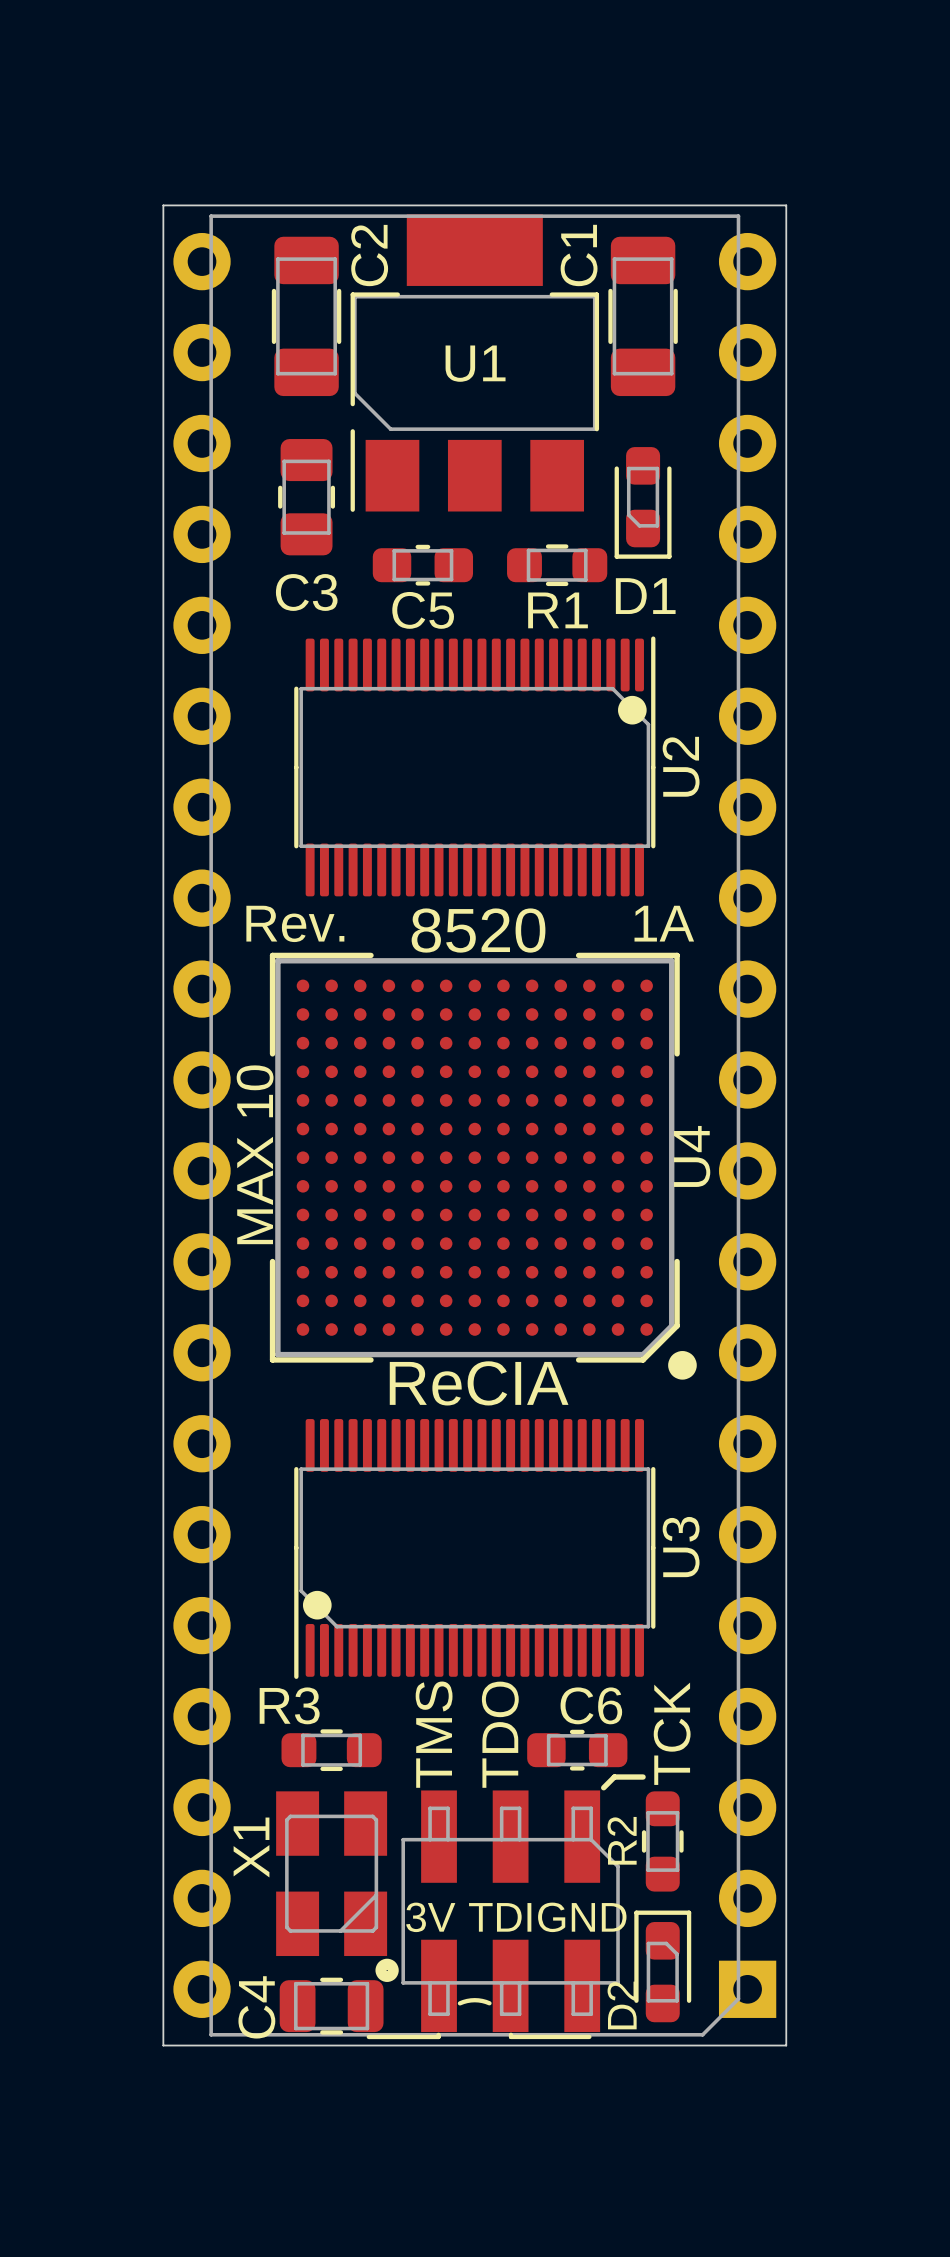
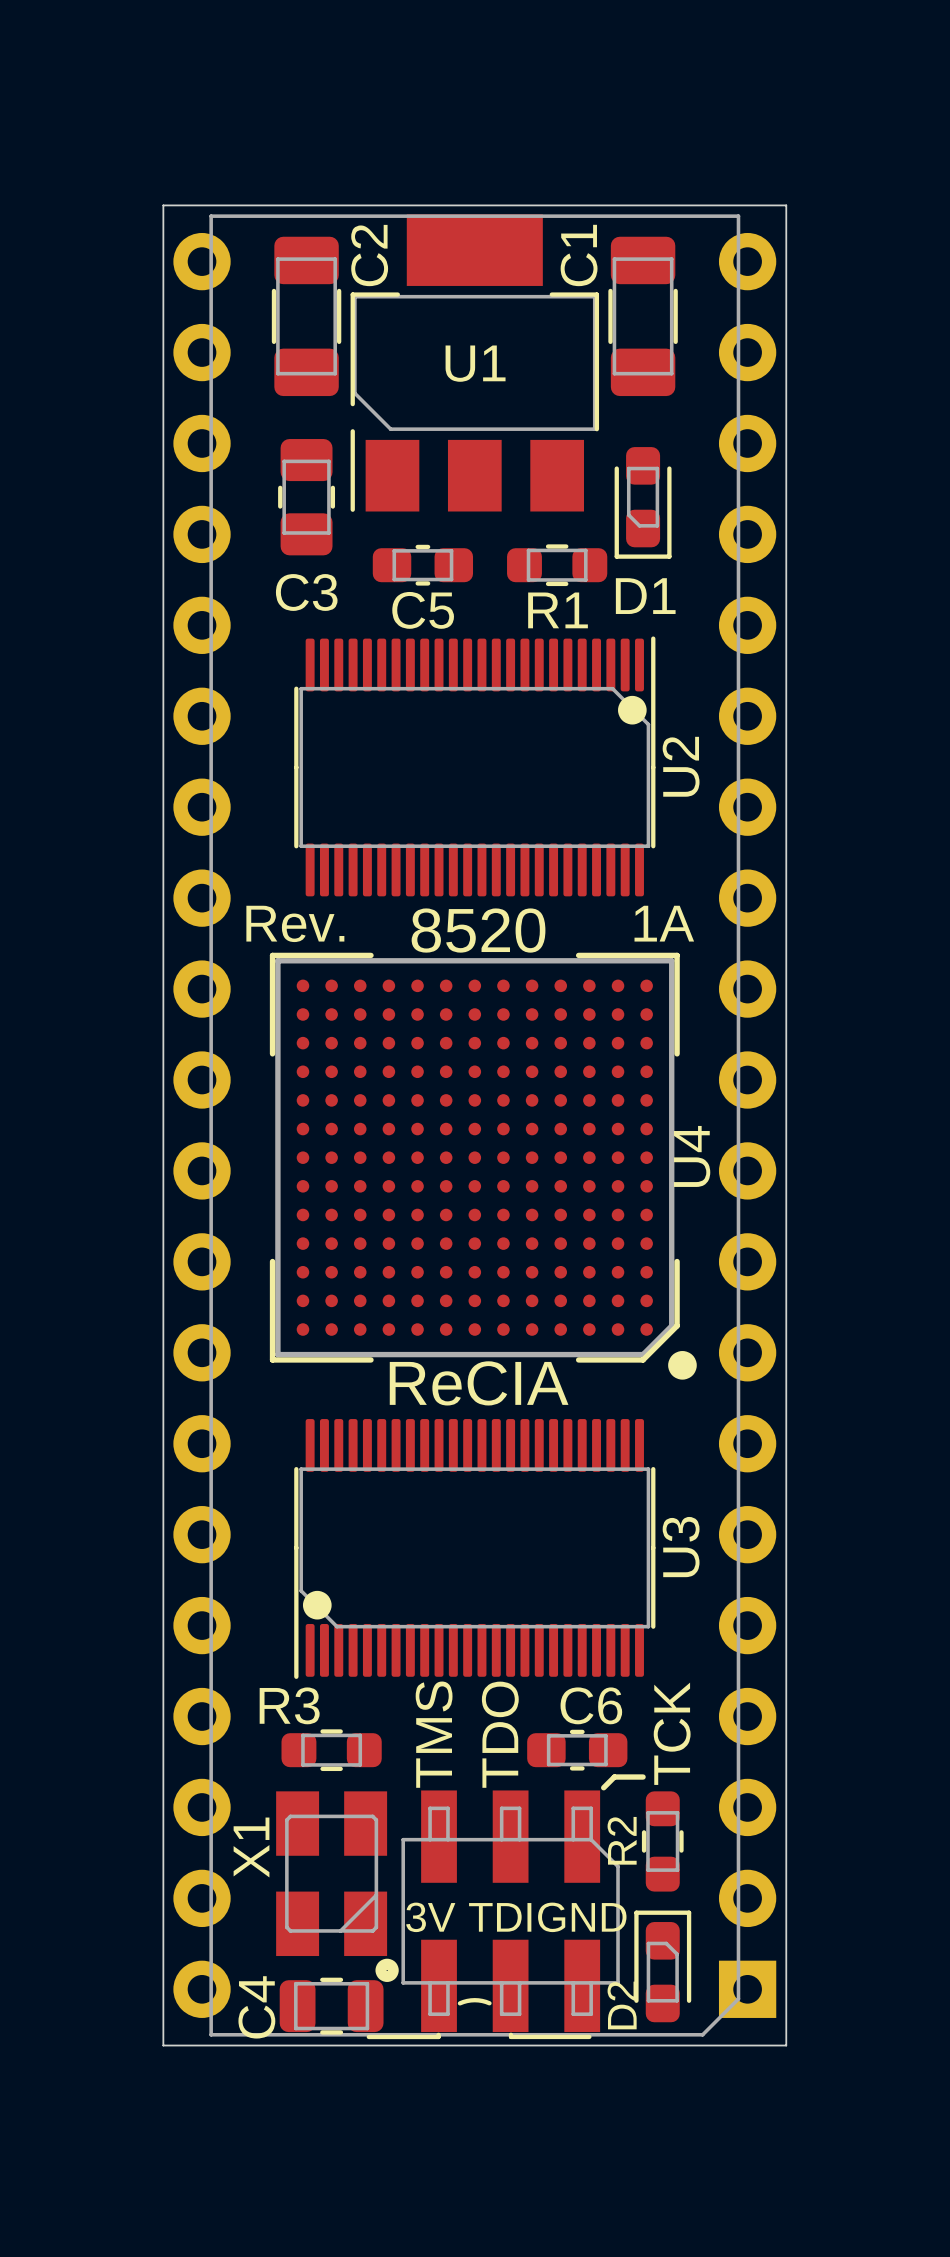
text: MAX 10 (255, 1154) -> none

